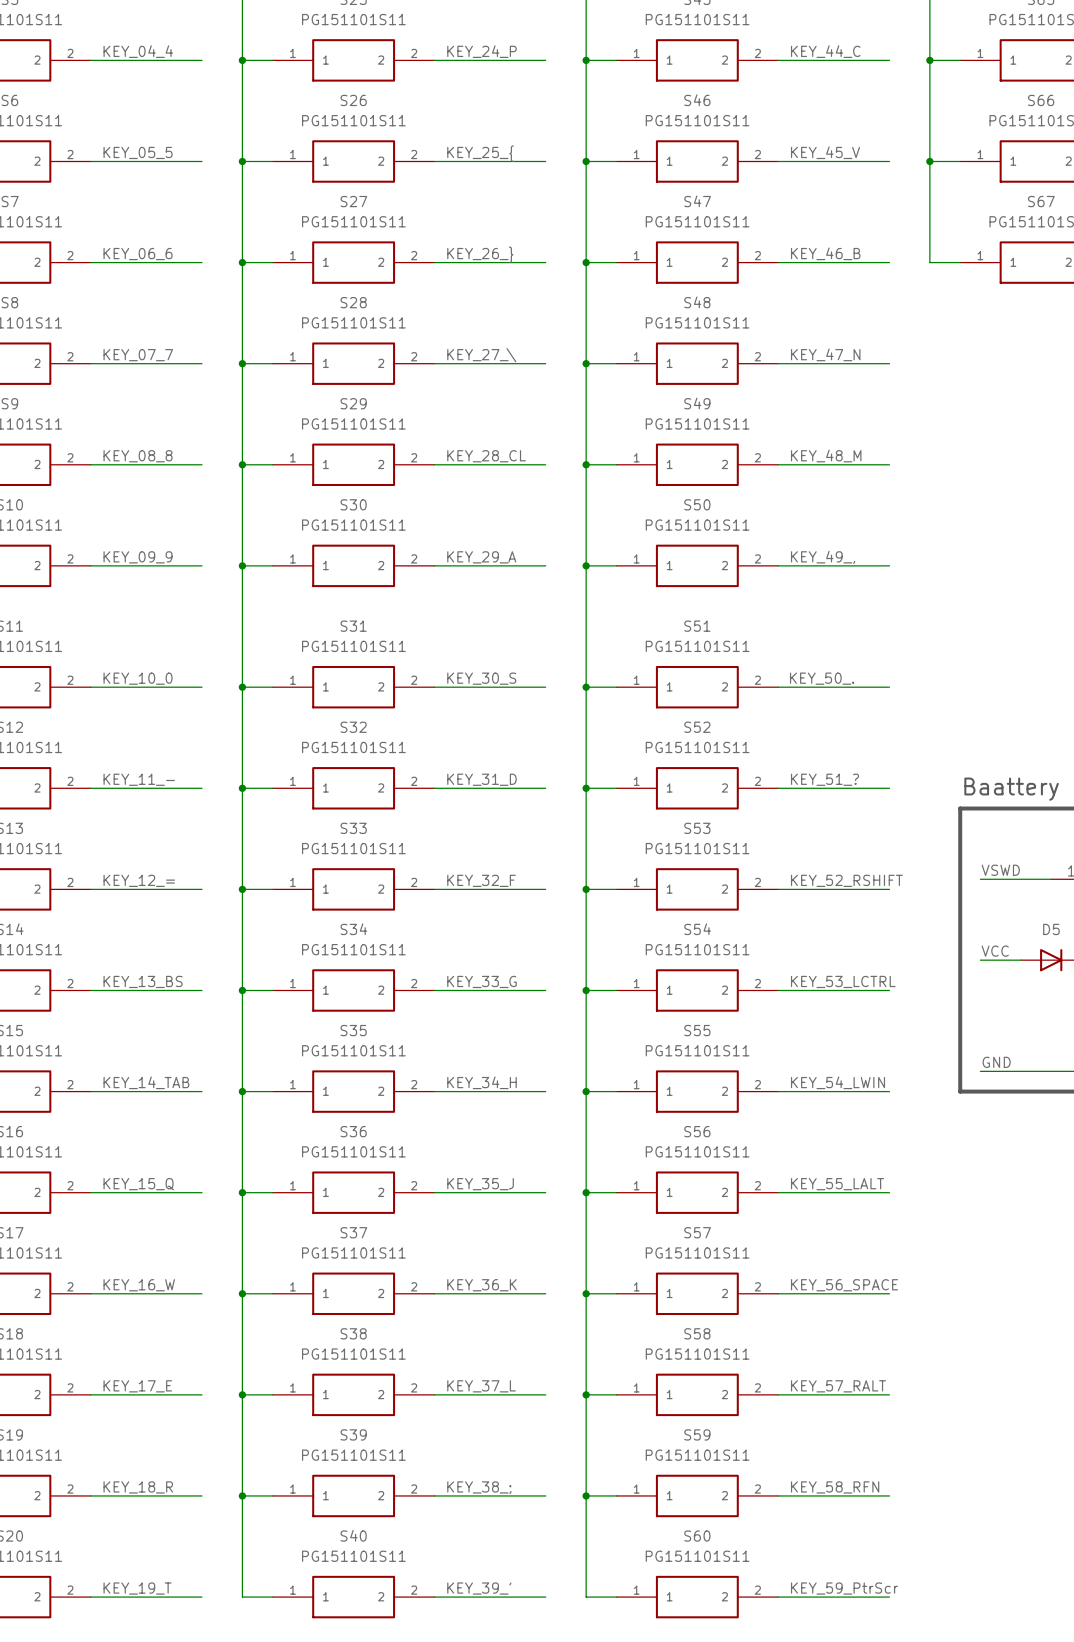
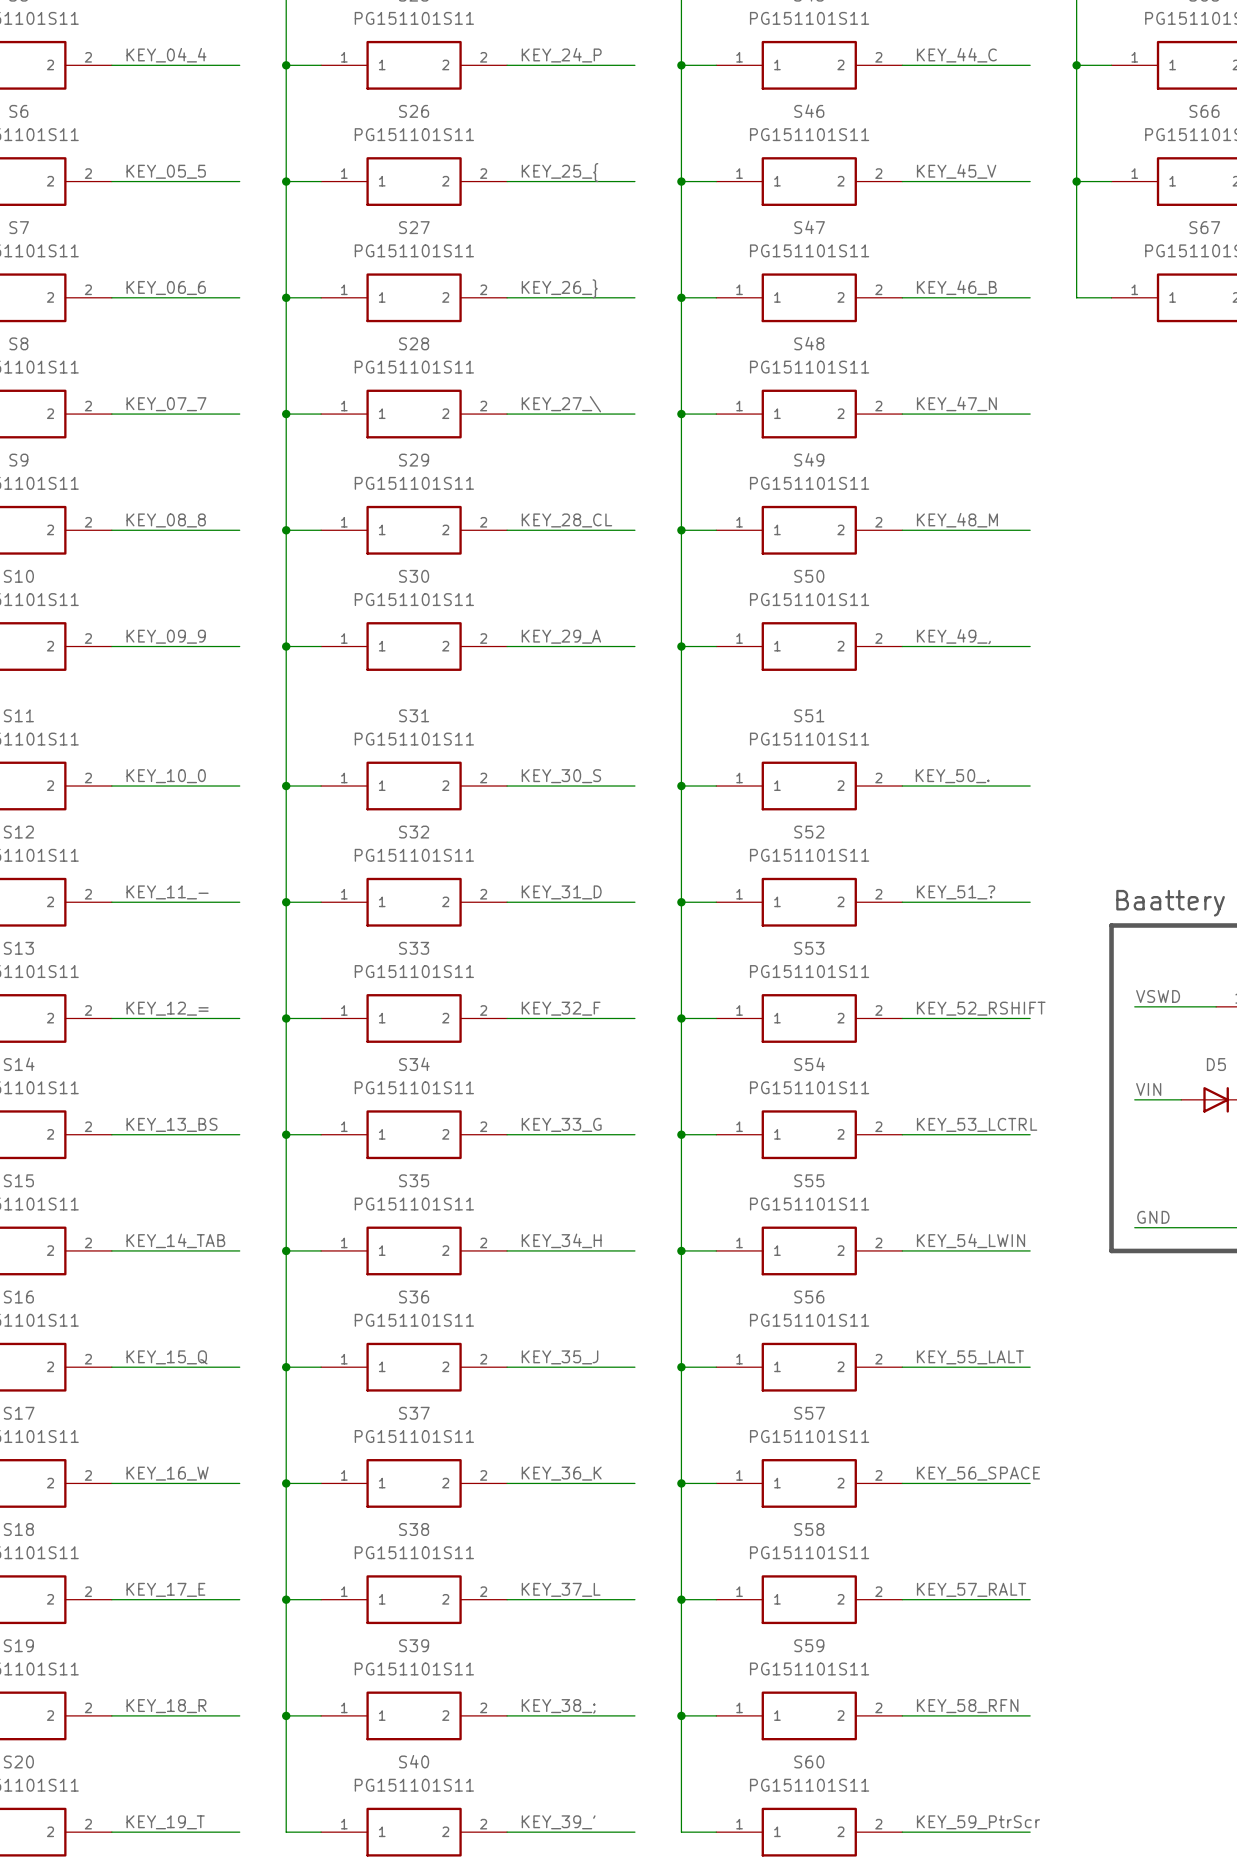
label: VCC (995, 951) -> VIN (1148, 1089)

